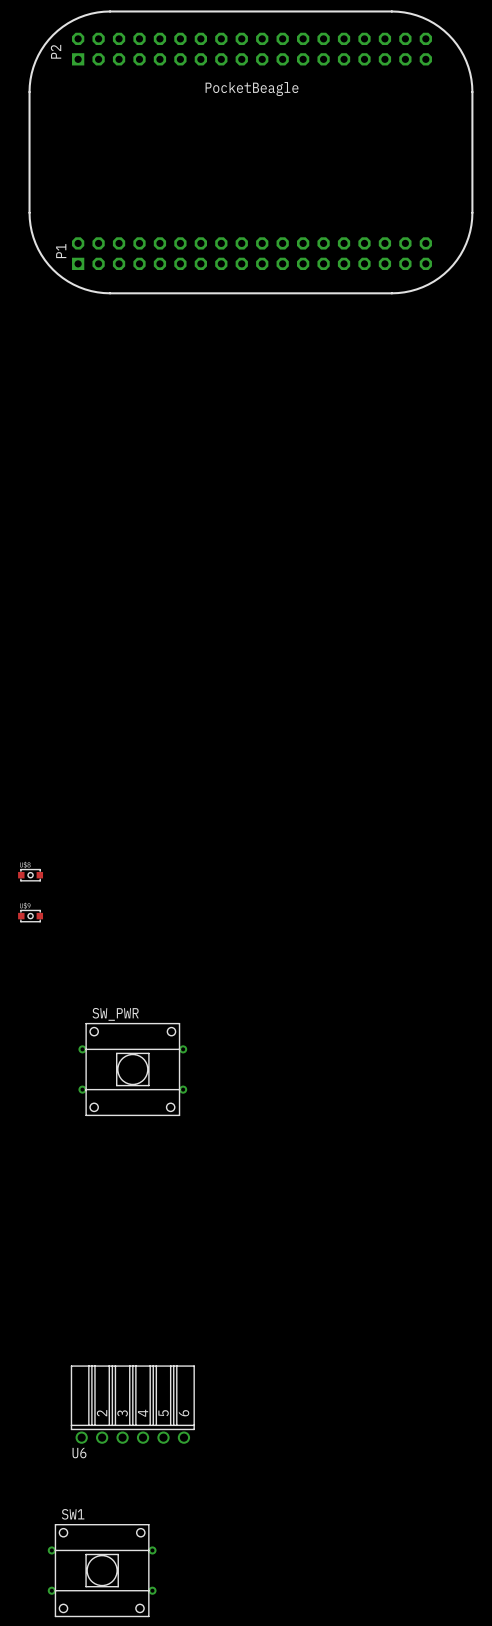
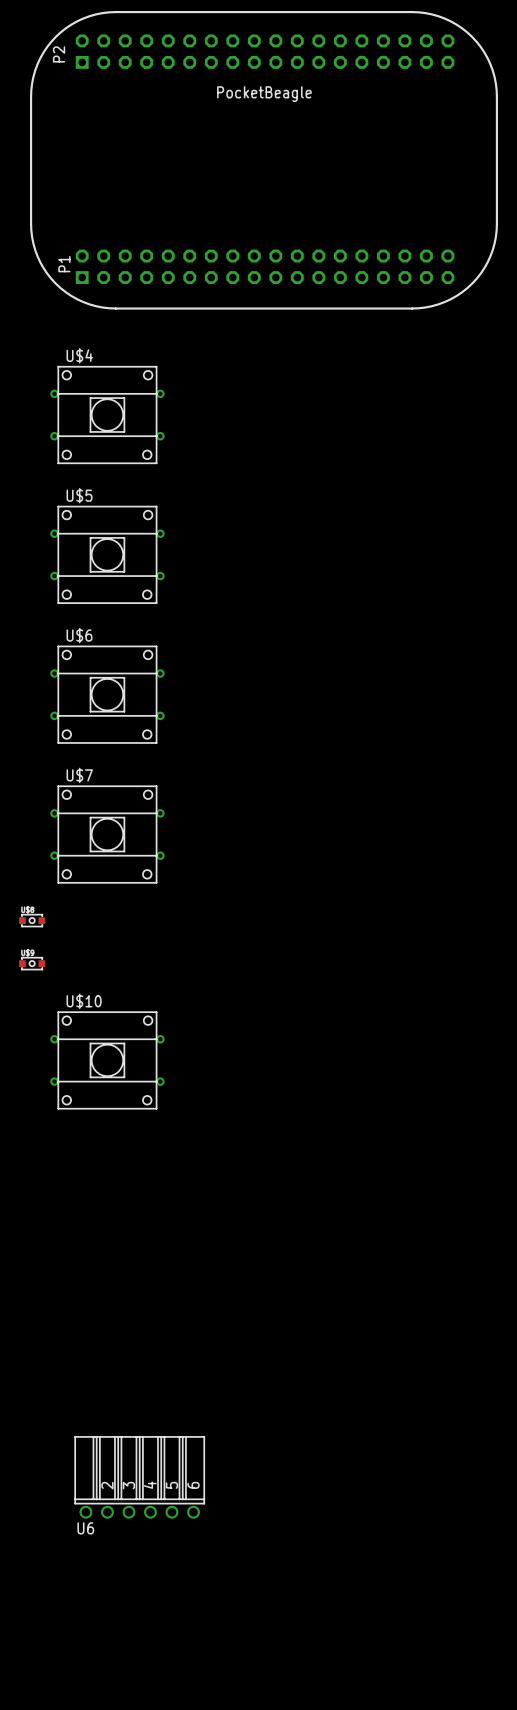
U$4: none -> (107, 415)
U$5: none -> (107, 554)
U$6: none -> (107, 694)
U$7: none -> (107, 834)
U$10: none -> (107, 1060)
SW_PWR: (132, 1069) -> none
SW1: (102, 1570) -> none

